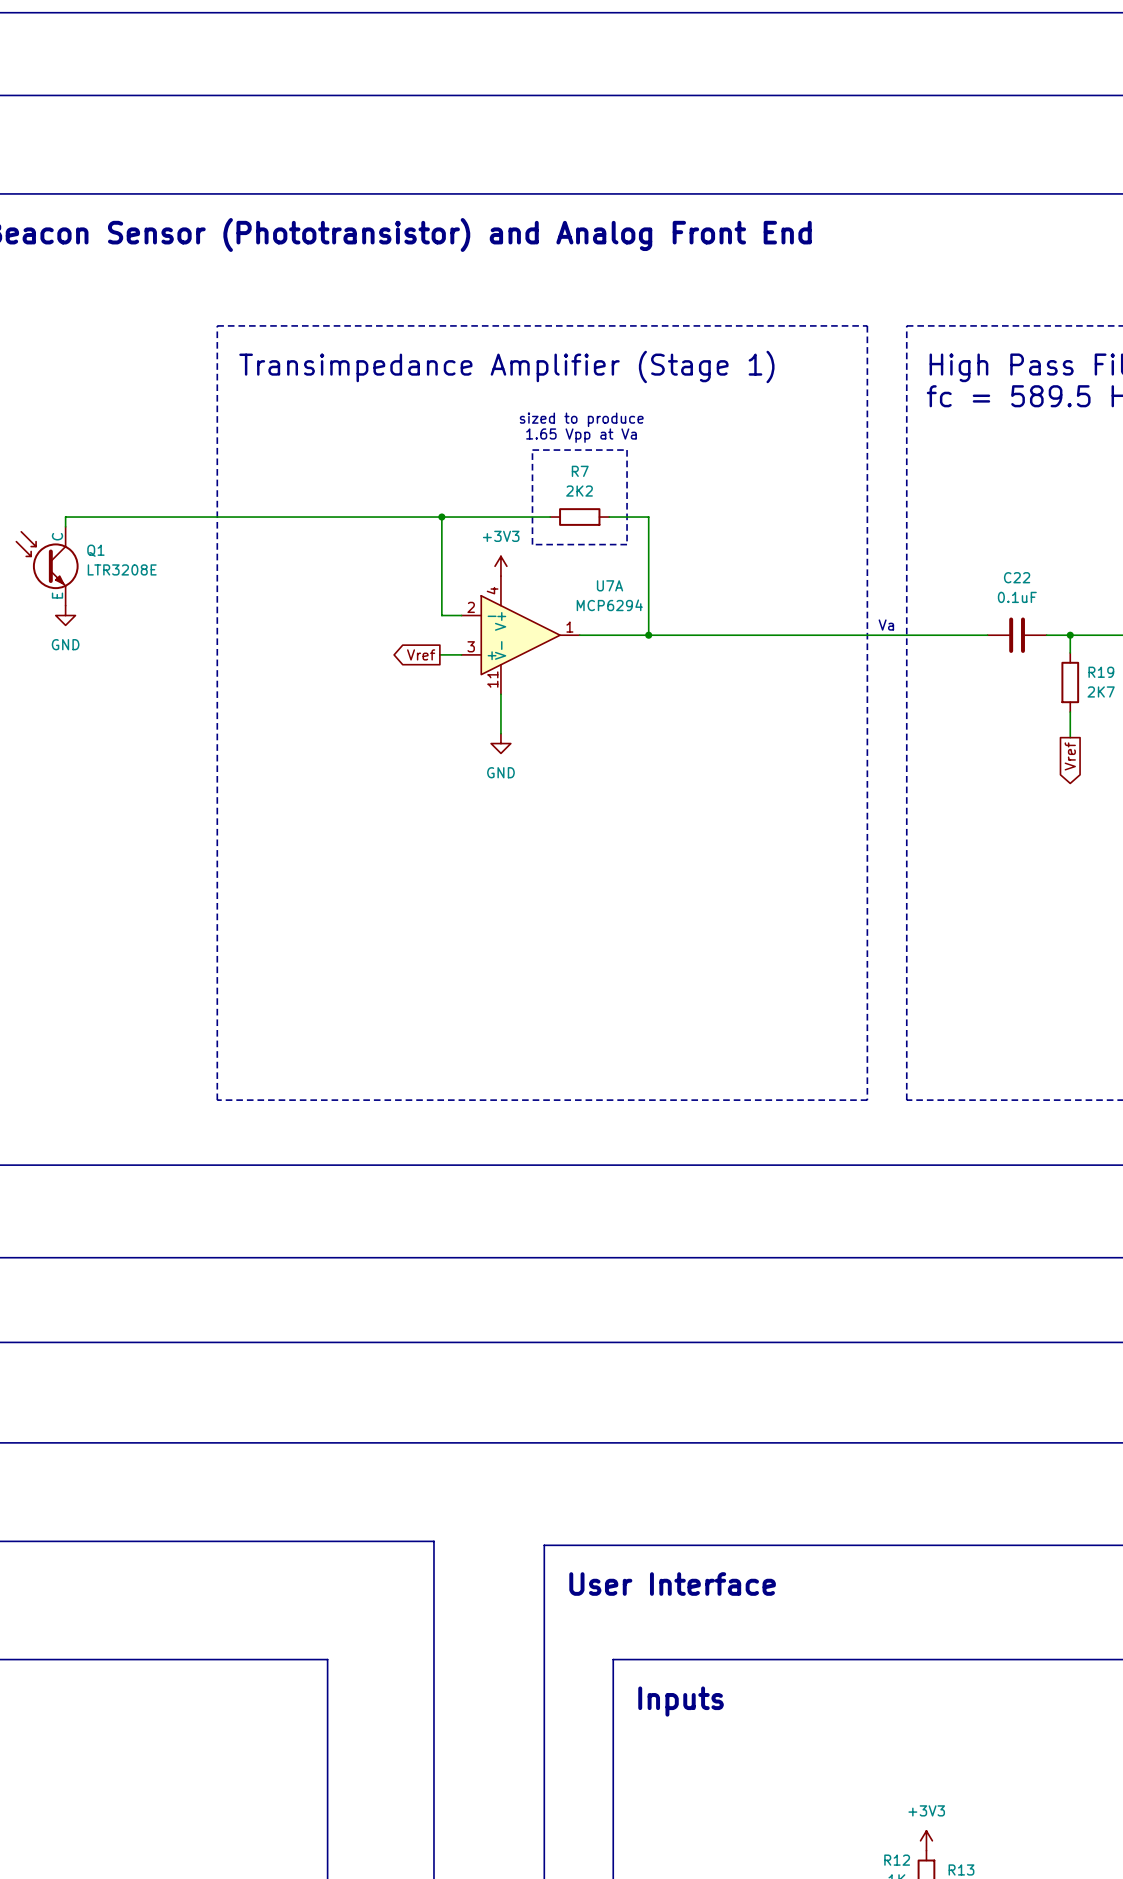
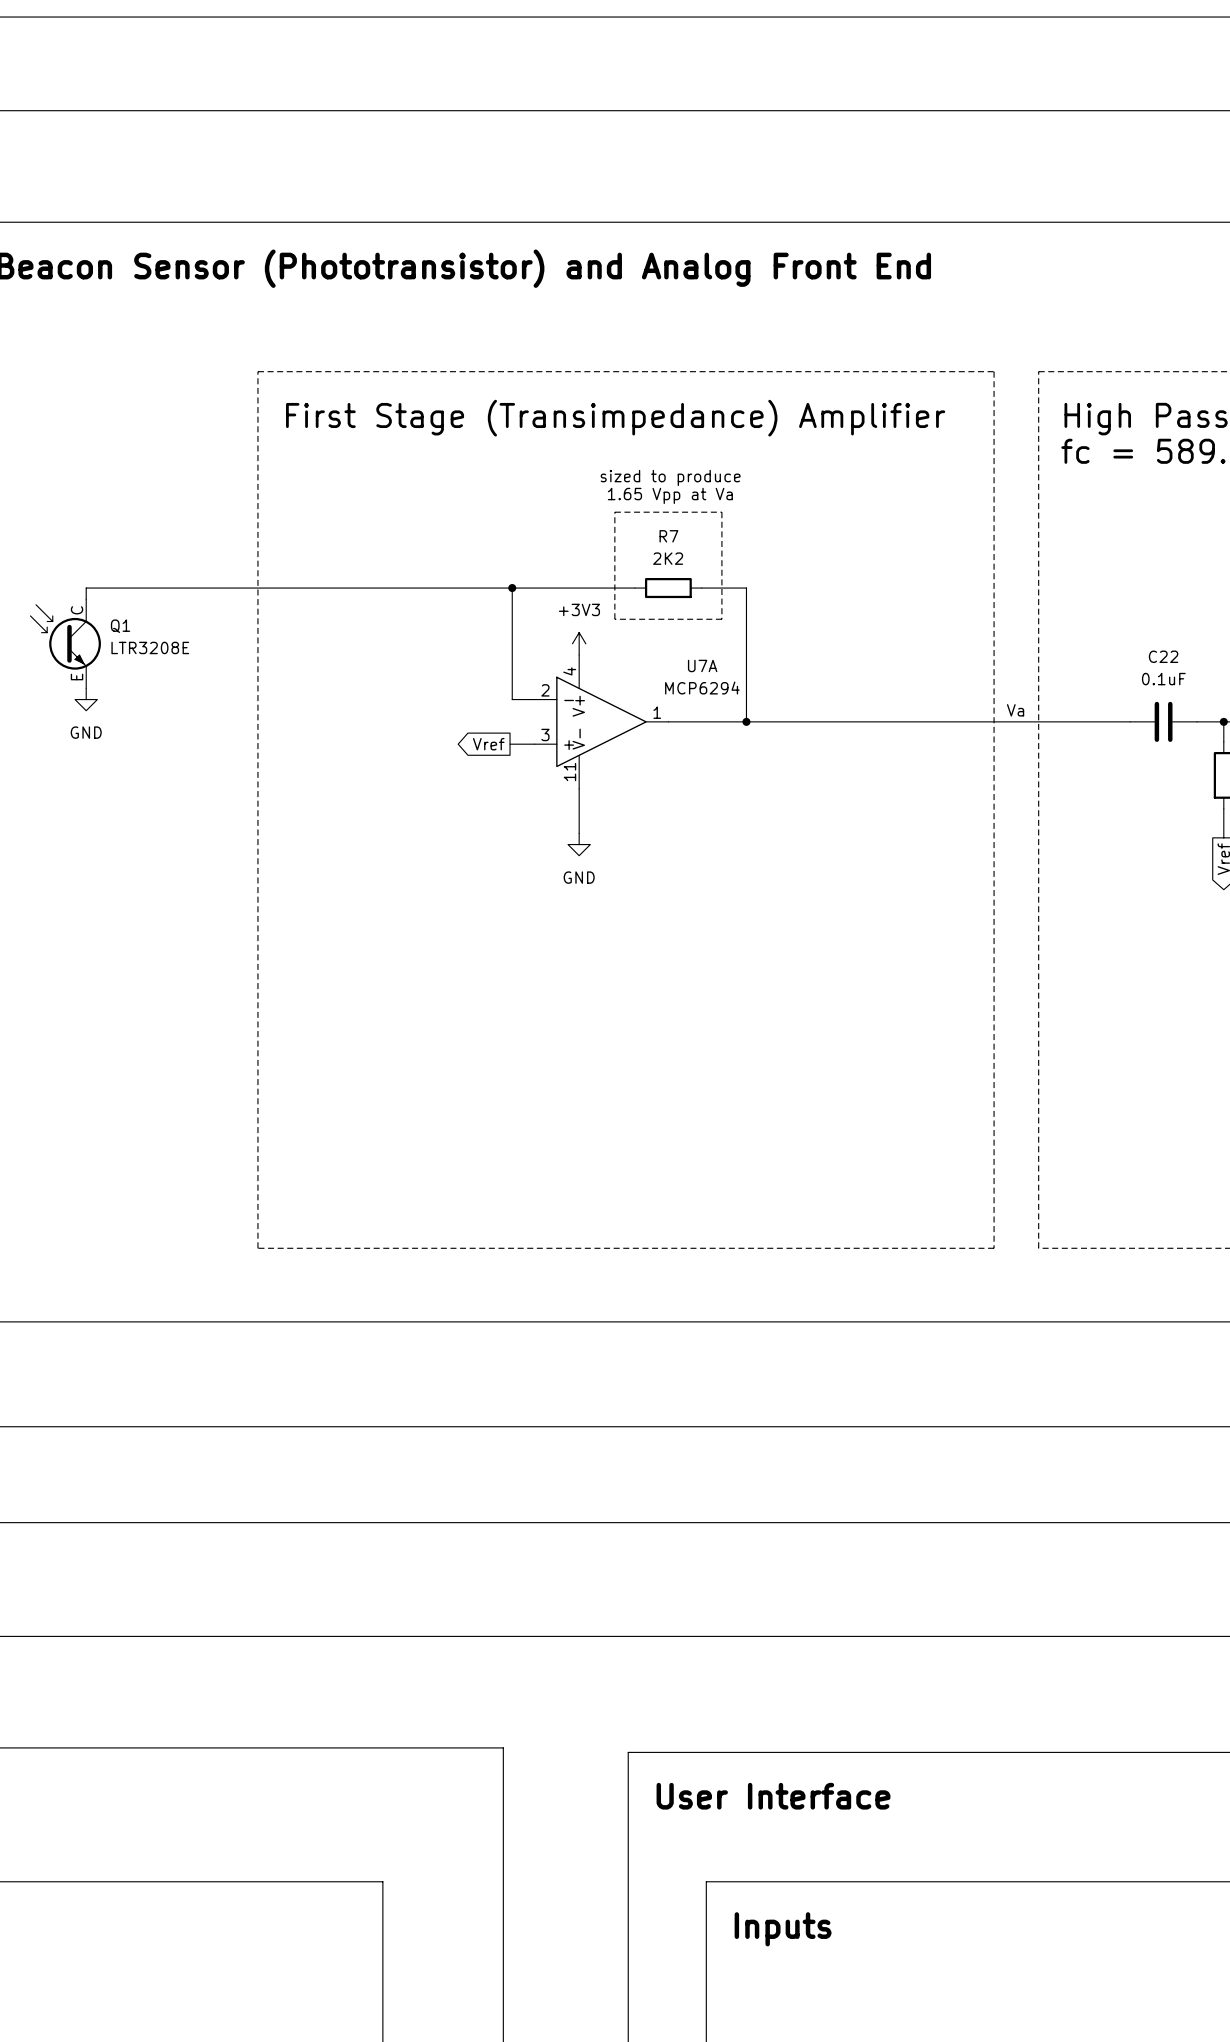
text: Transimpedance Amplifier (Stage 1) (506, 366) -> First Stage (Transimpedance) Amplifier (615, 418)

